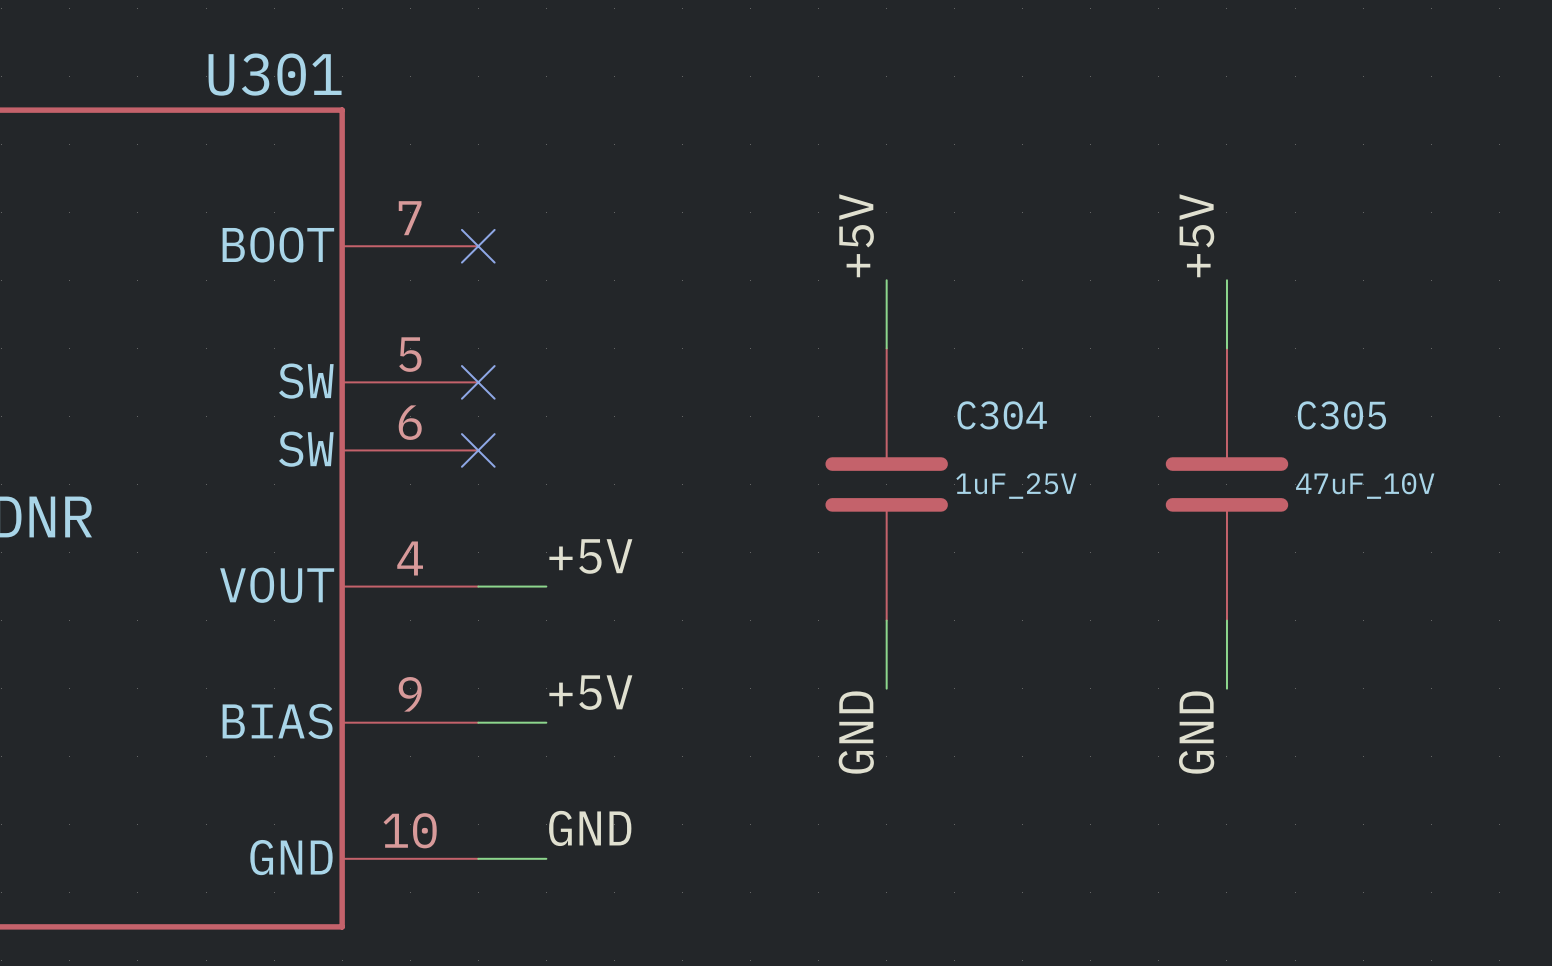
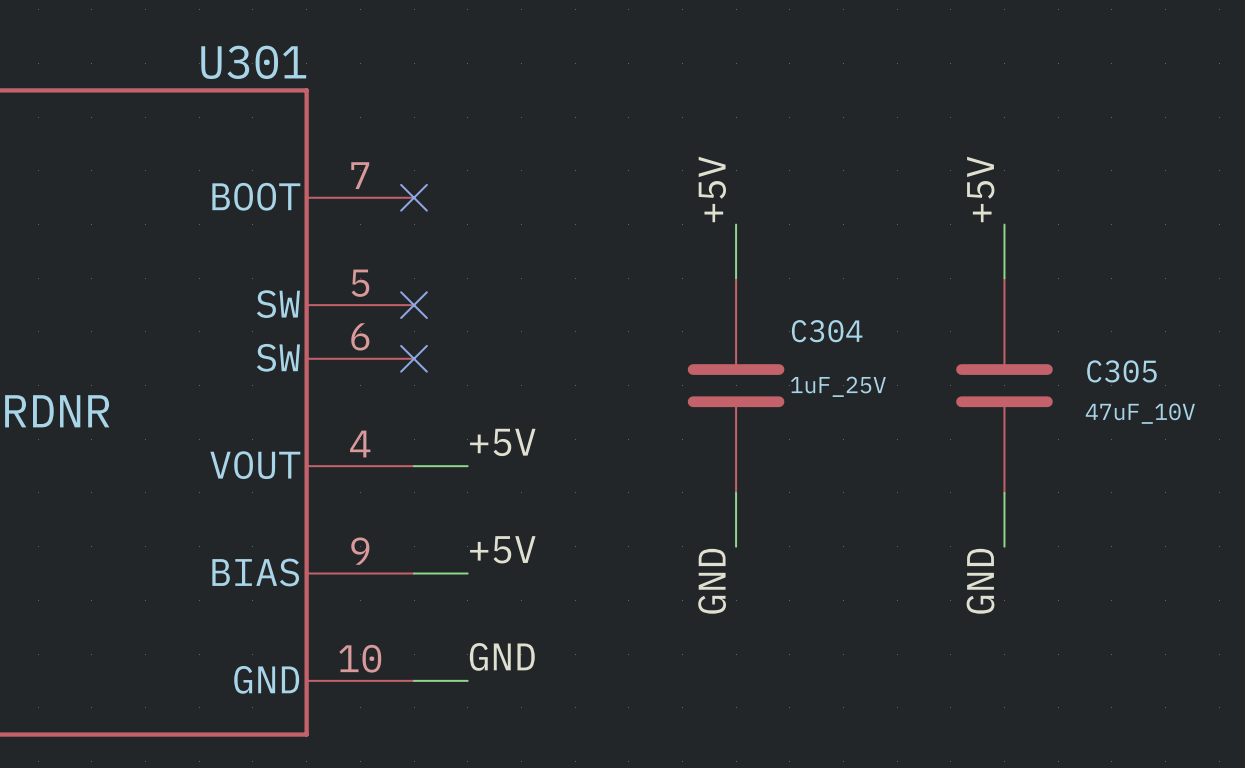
C305 name position: C305 (1341, 415) -> C305 (1121, 371)
C305 value position: 47uF_10V (1365, 486) -> 47uF_10V (1140, 413)

